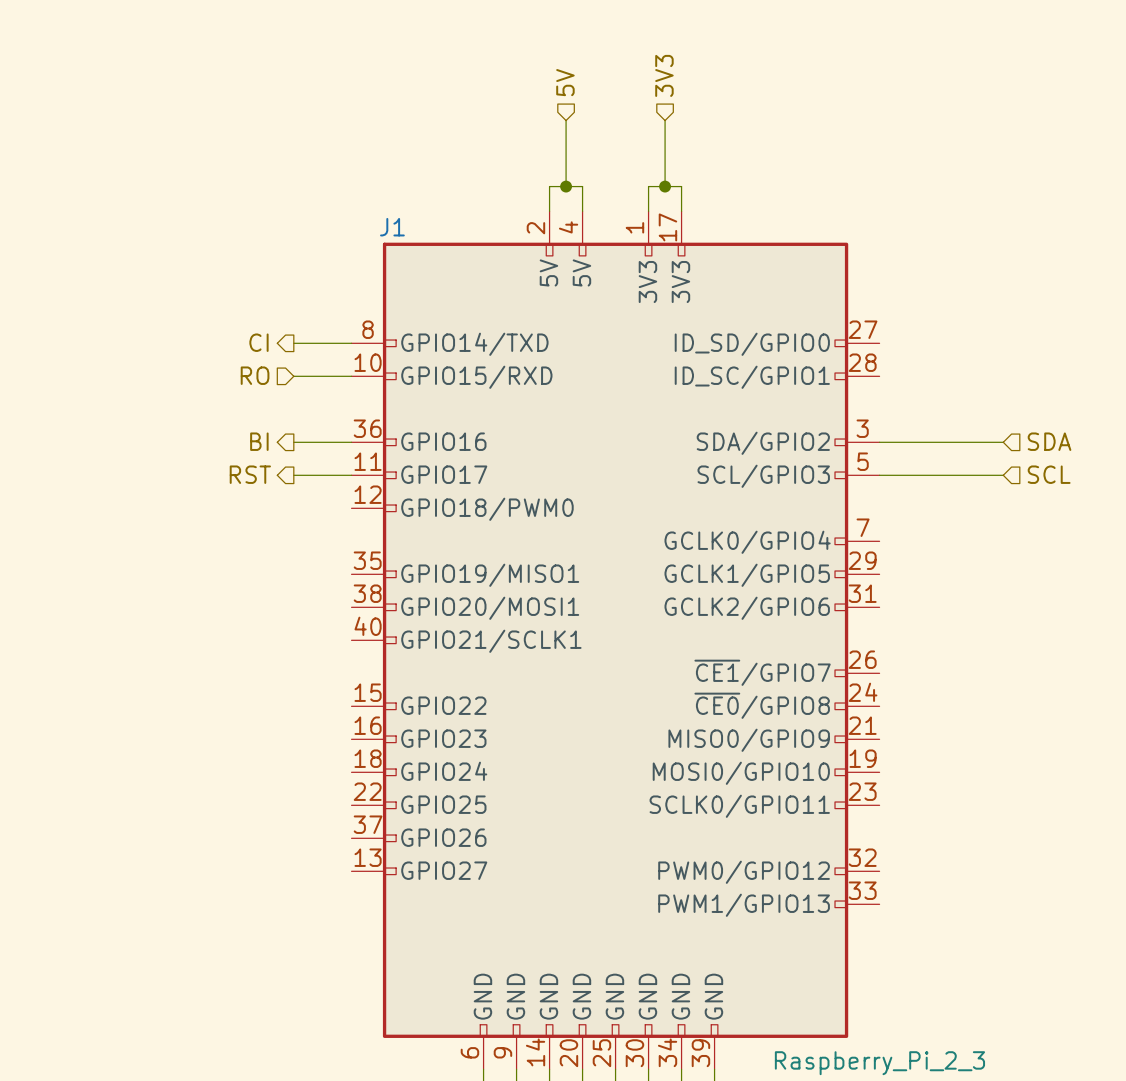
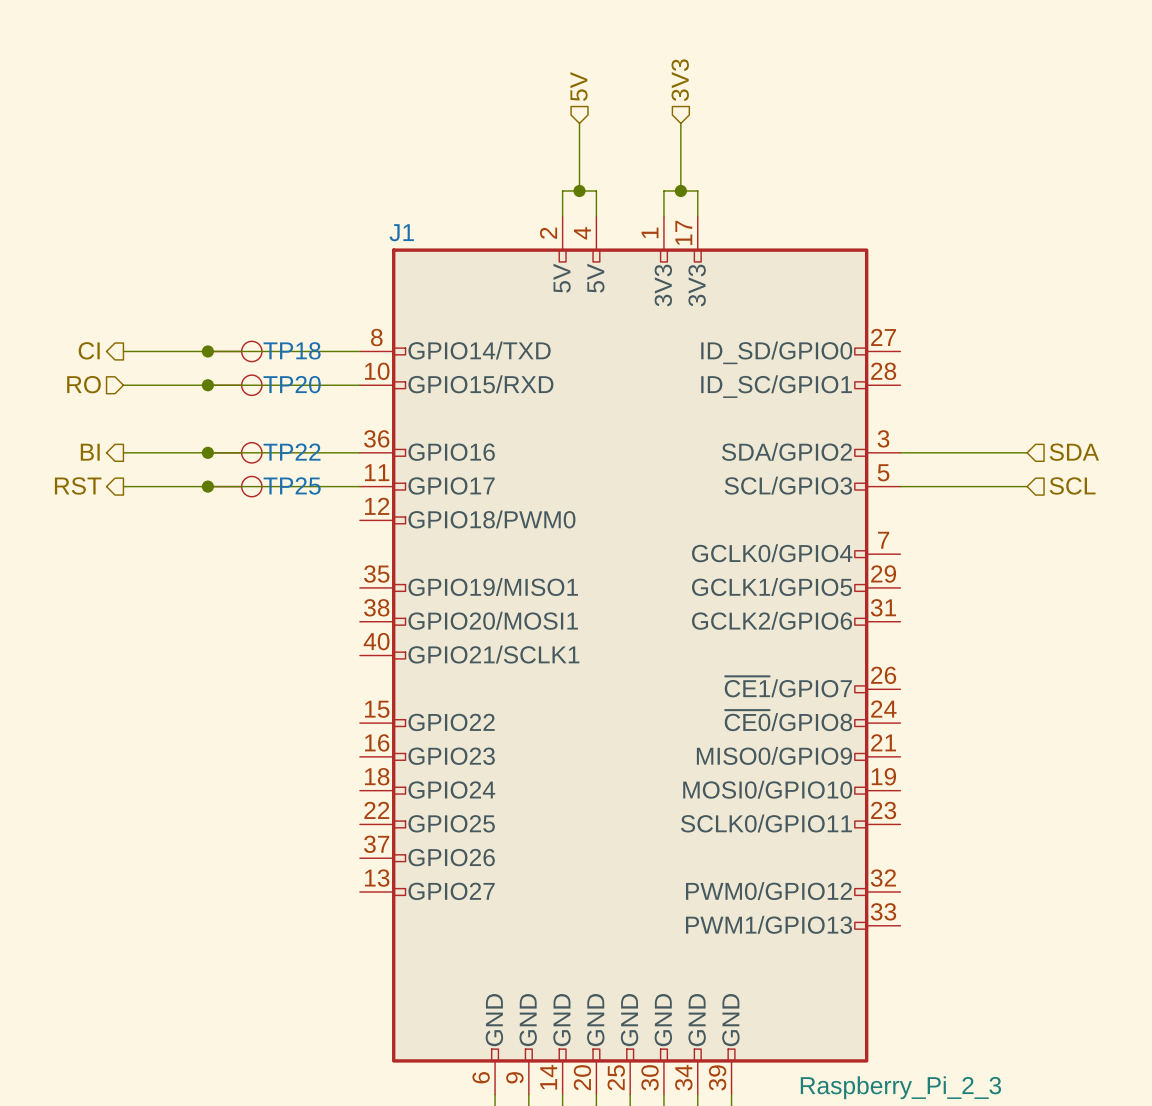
hierarchical label position: CI (258, 342) -> CI (89, 350)
wire: none -> (123, 351) (300, 351)
junction: none -> (207, 351)
TP18: none -> (234, 351)
hierarchical label position: RO (255, 375) -> RO (83, 384)
wire: none -> (123, 385) (300, 385)
junction: none -> (207, 385)
TP20: none -> (234, 385)
hierarchical label position: BI (259, 441) -> BI (90, 452)
wire: none -> (123, 452) (300, 452)
junction: none -> (207, 452)
TP22: none -> (234, 452)
hierarchical label position: RST (250, 474) -> RST (78, 485)
wire: none -> (123, 486) (300, 486)
junction: none -> (207, 486)
TP25: none -> (234, 486)

